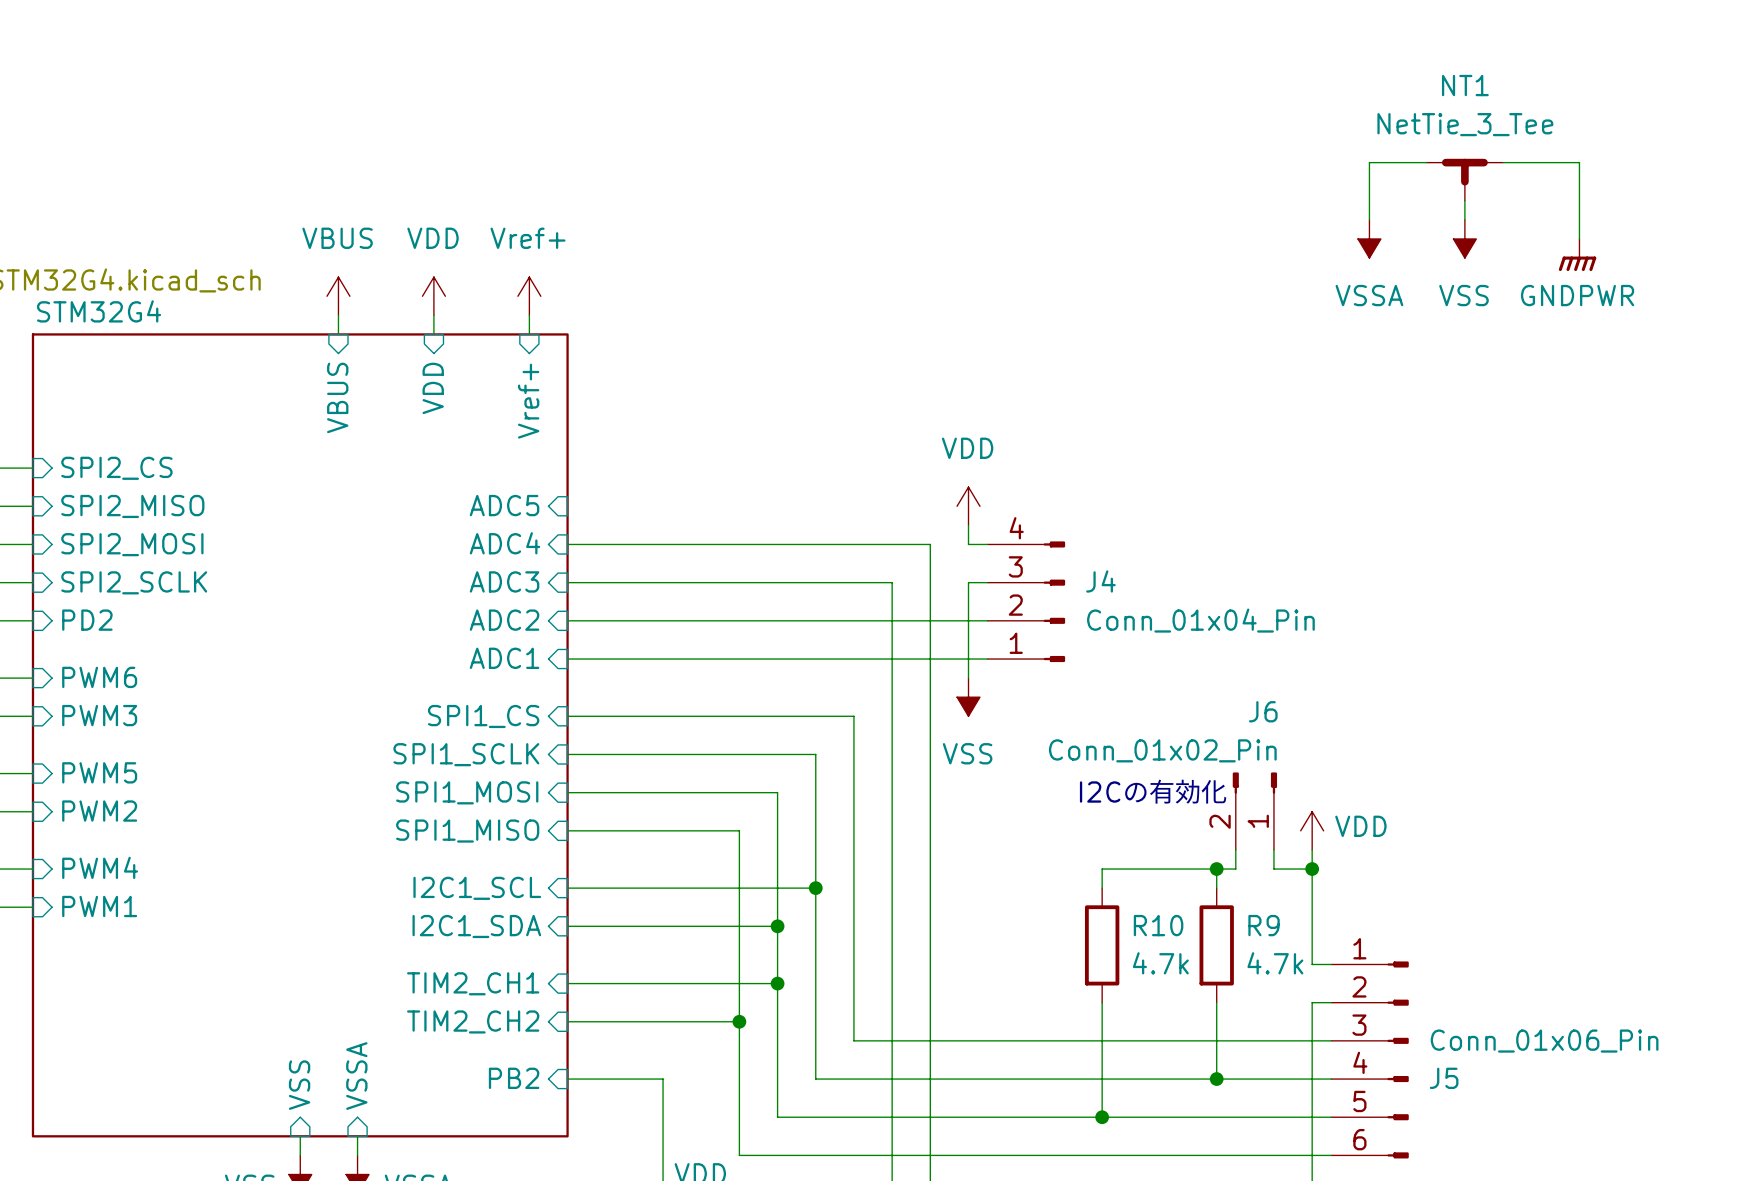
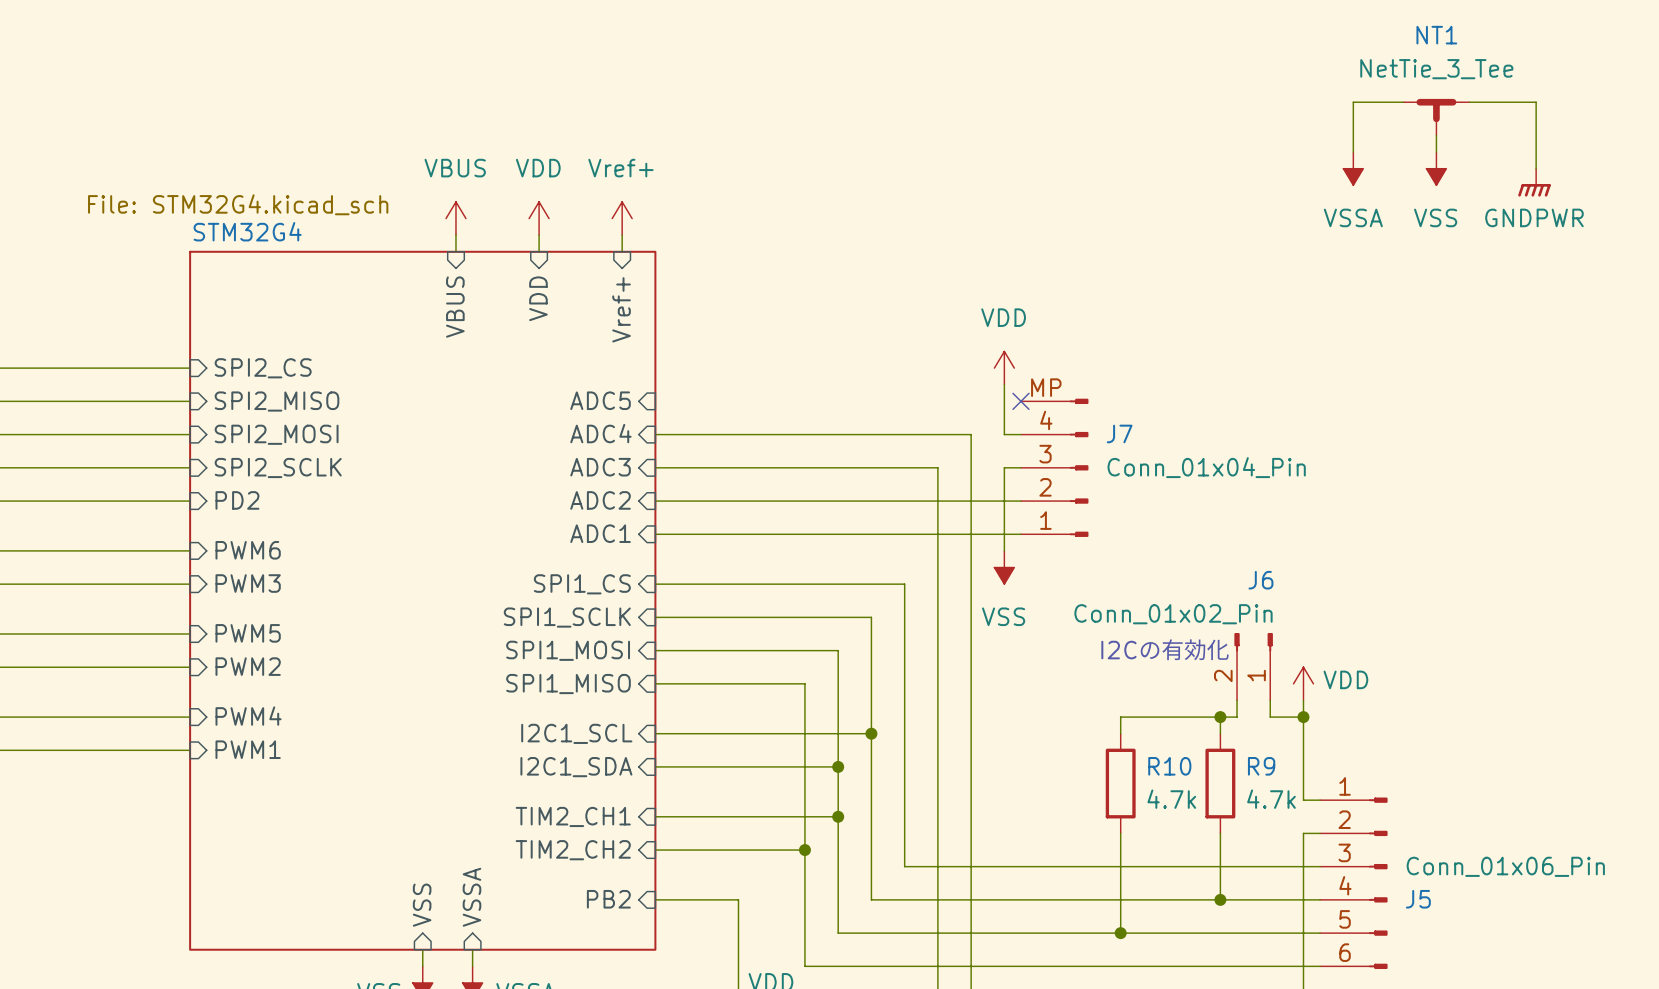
power symbol position: VDD (968, 506) -> VDD (1004, 368)
no-connect mark: none -> (1020, 401)
J7: none -> Conn_01x04_Pin (1054, 467)
J4: Conn_01x04_Pin (1026, 601) -> none

